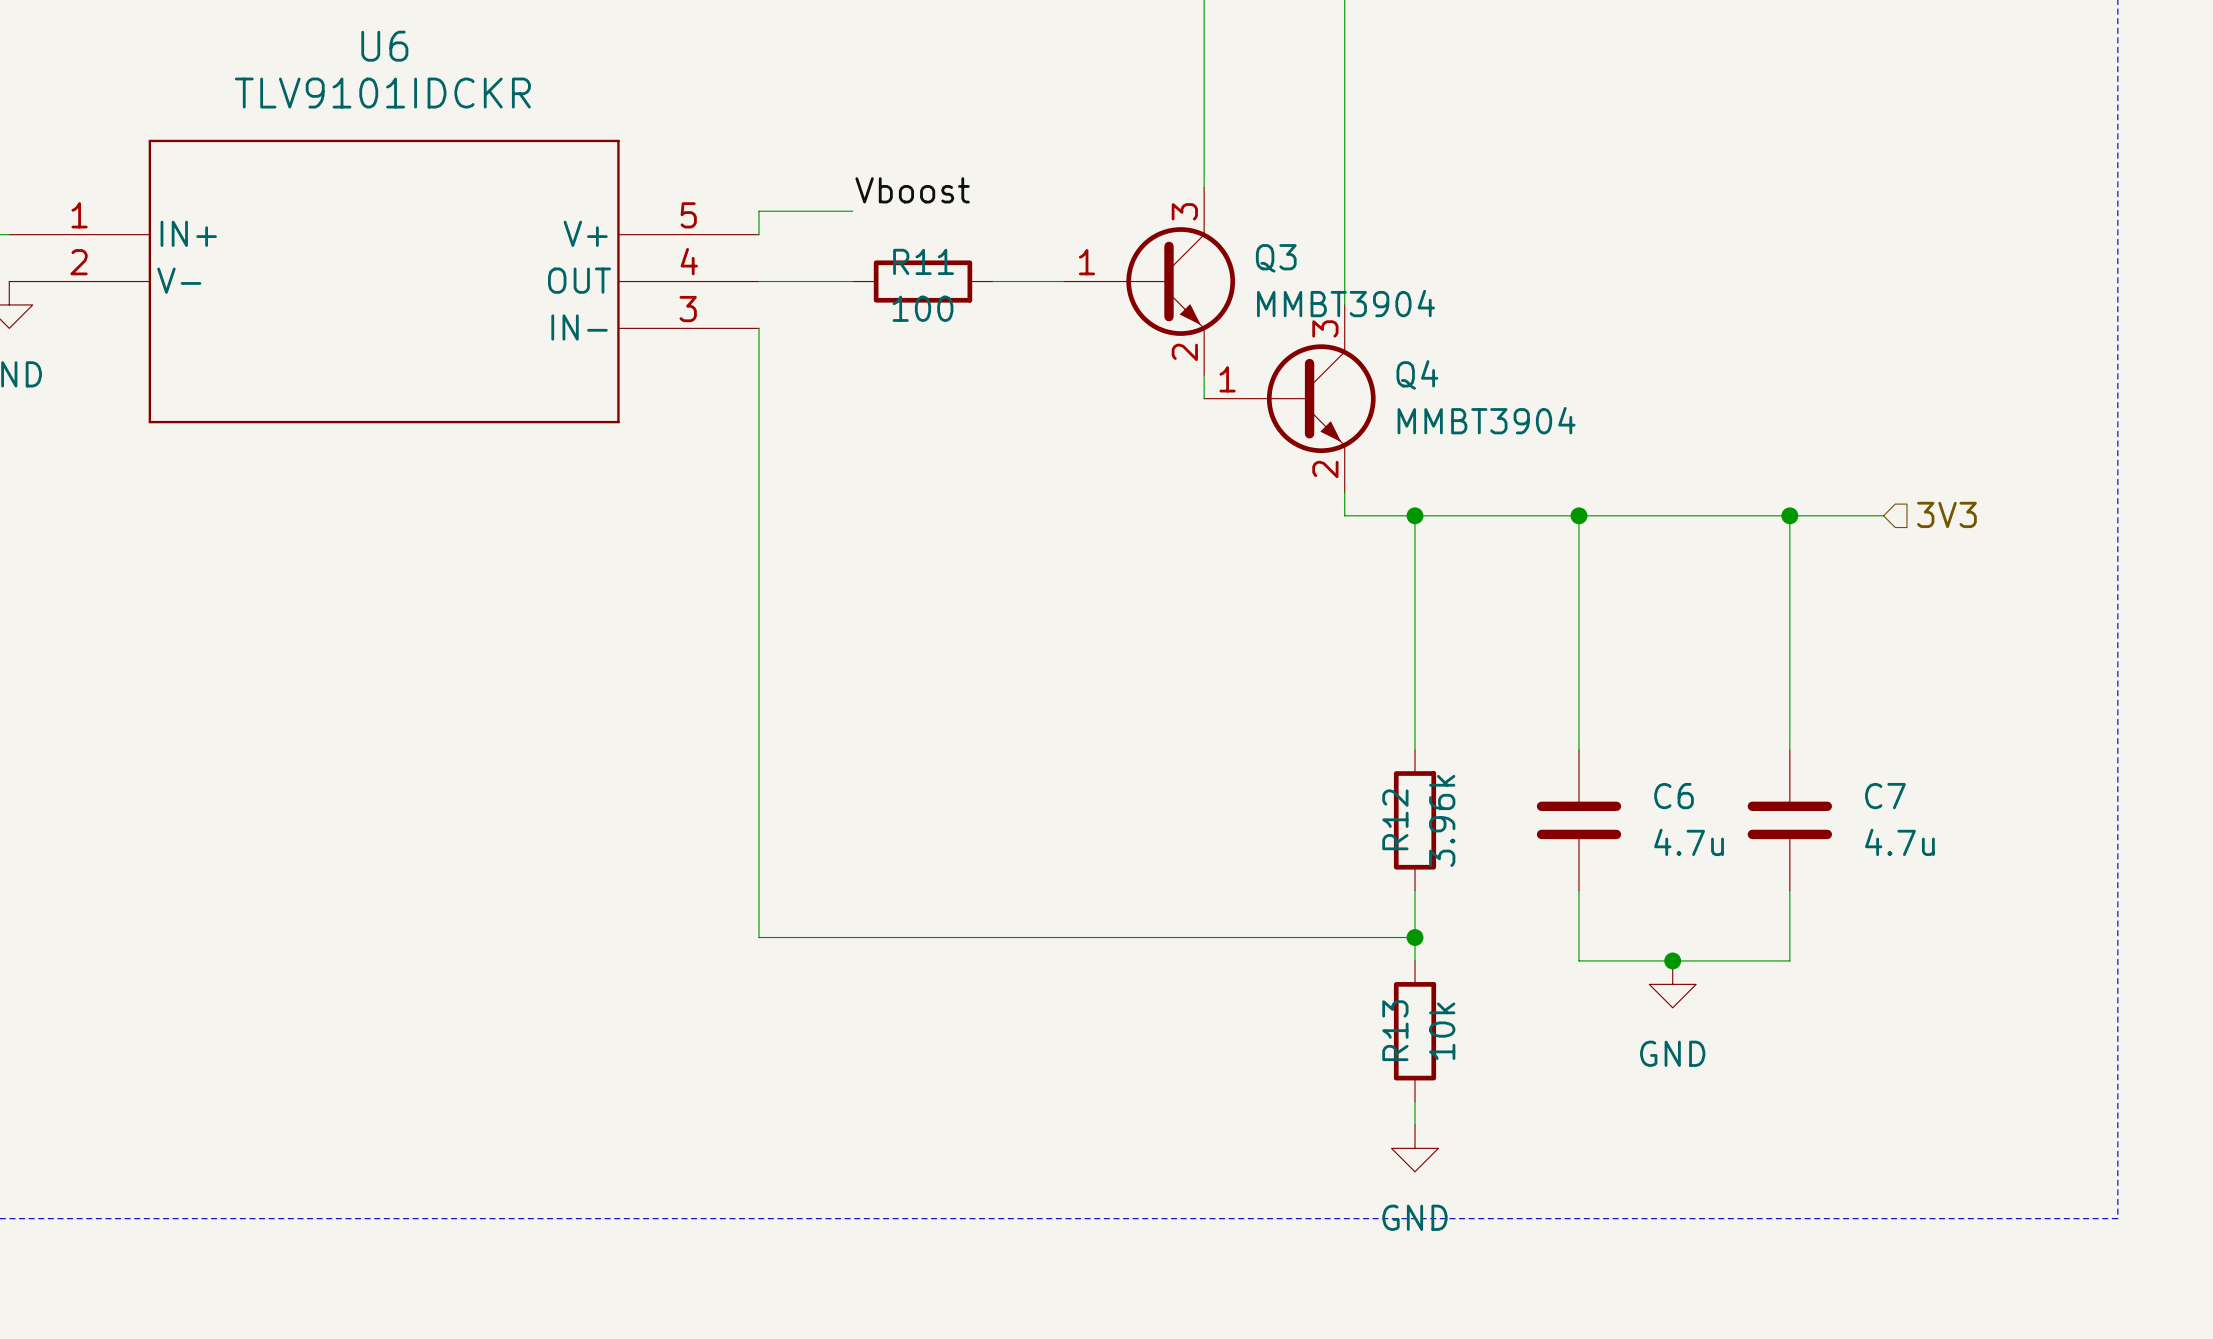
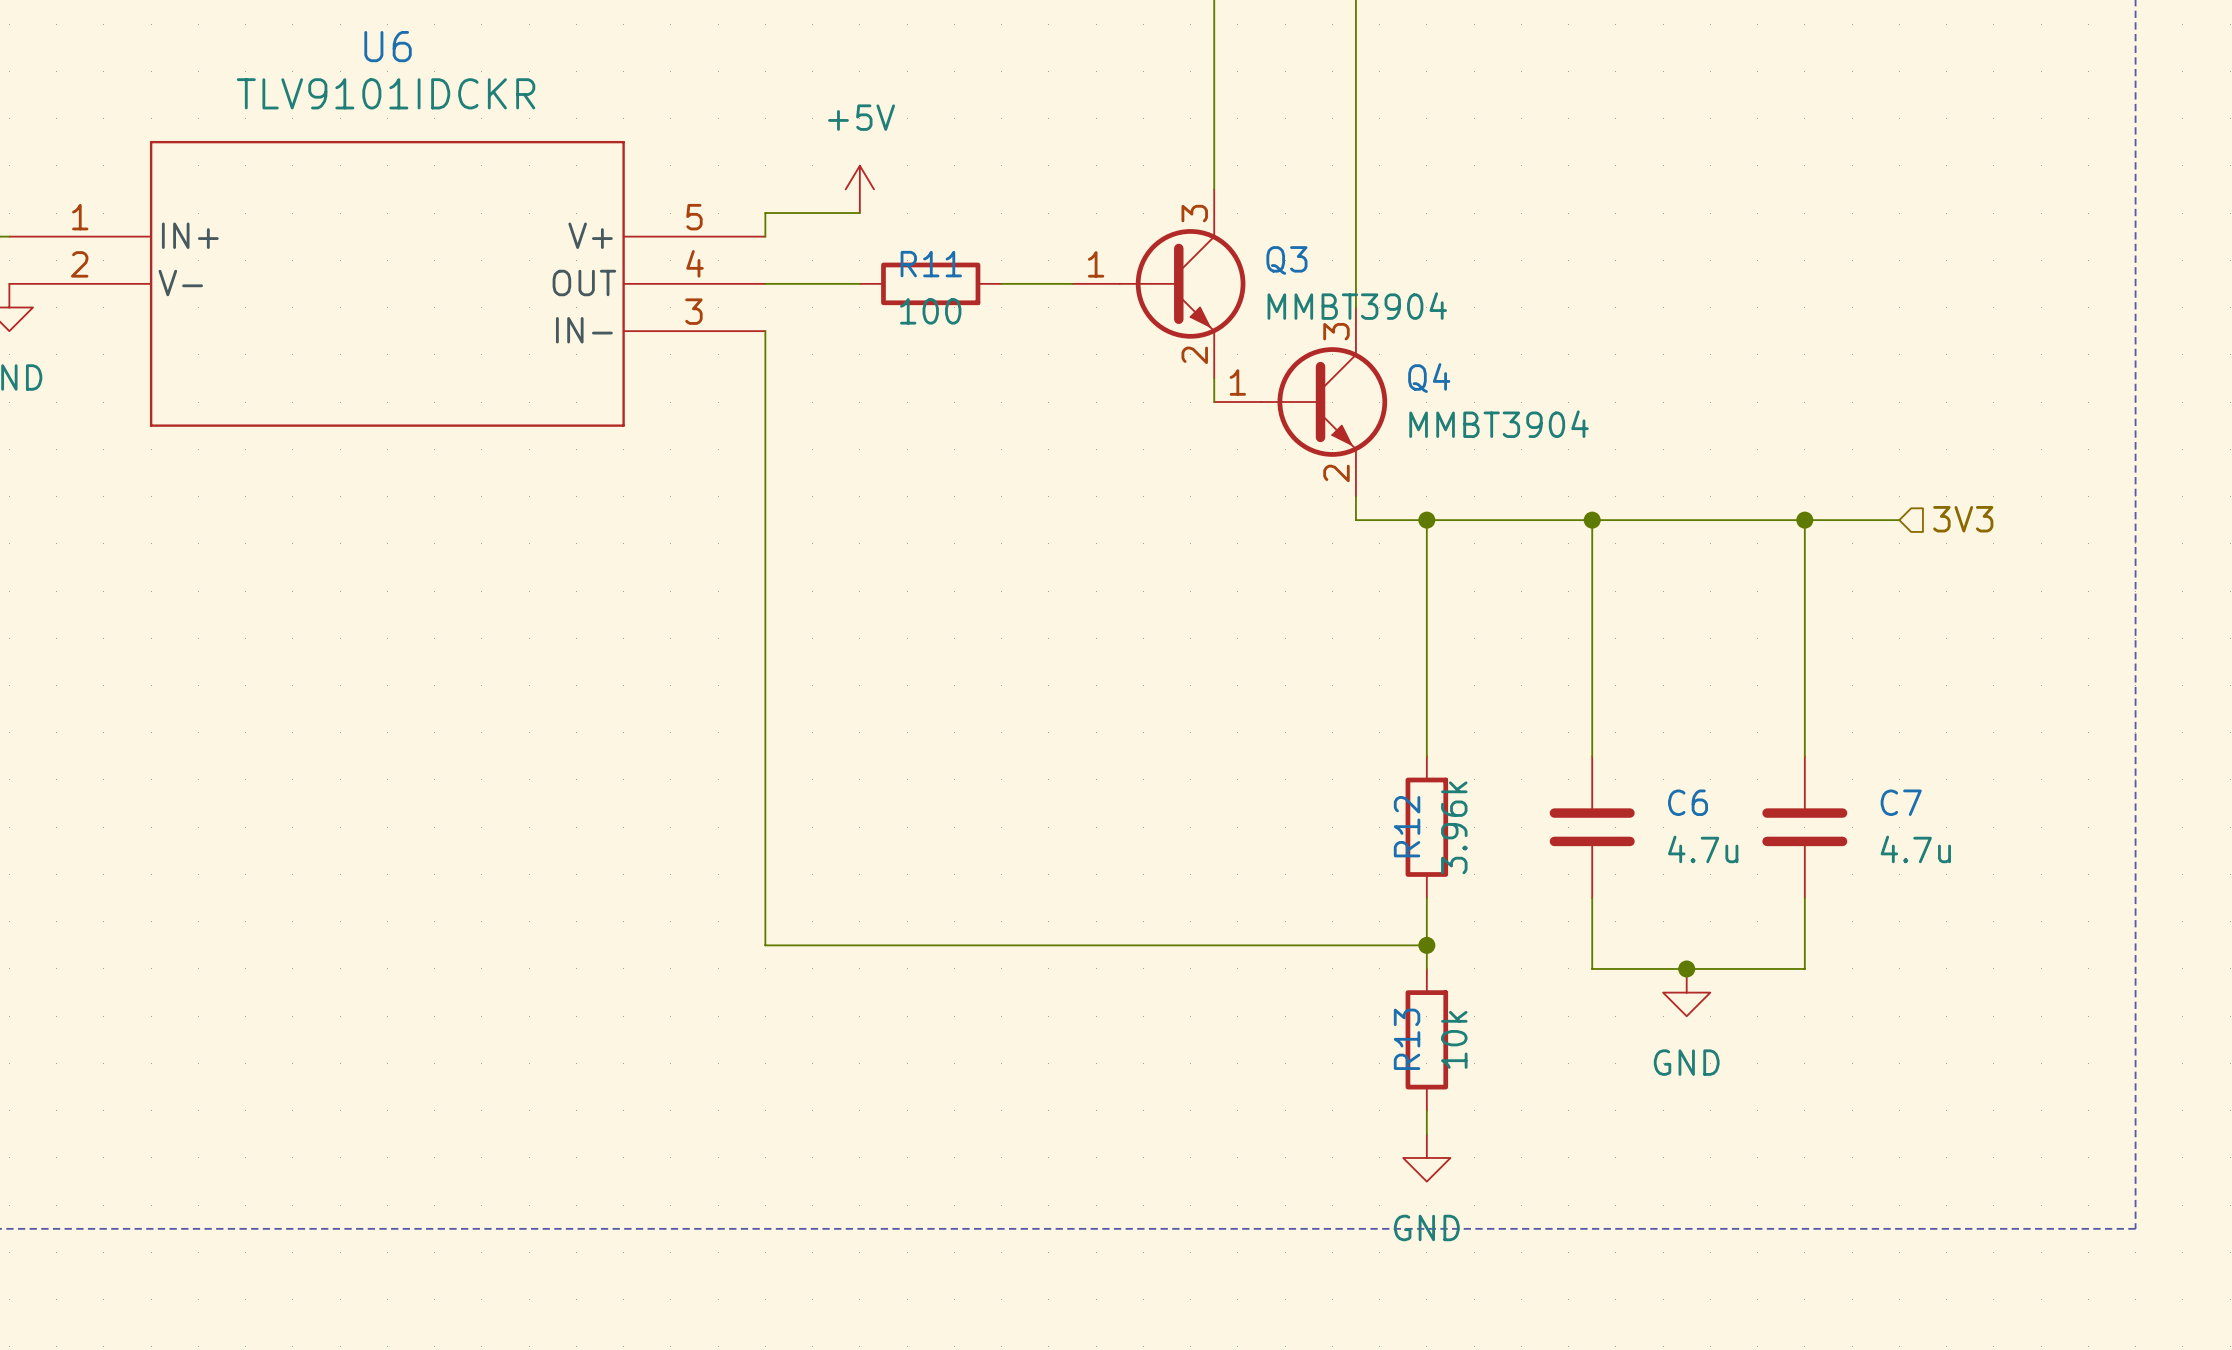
power symbol: none -> +5V (859, 189)
label: Vboost (912, 190) -> none

